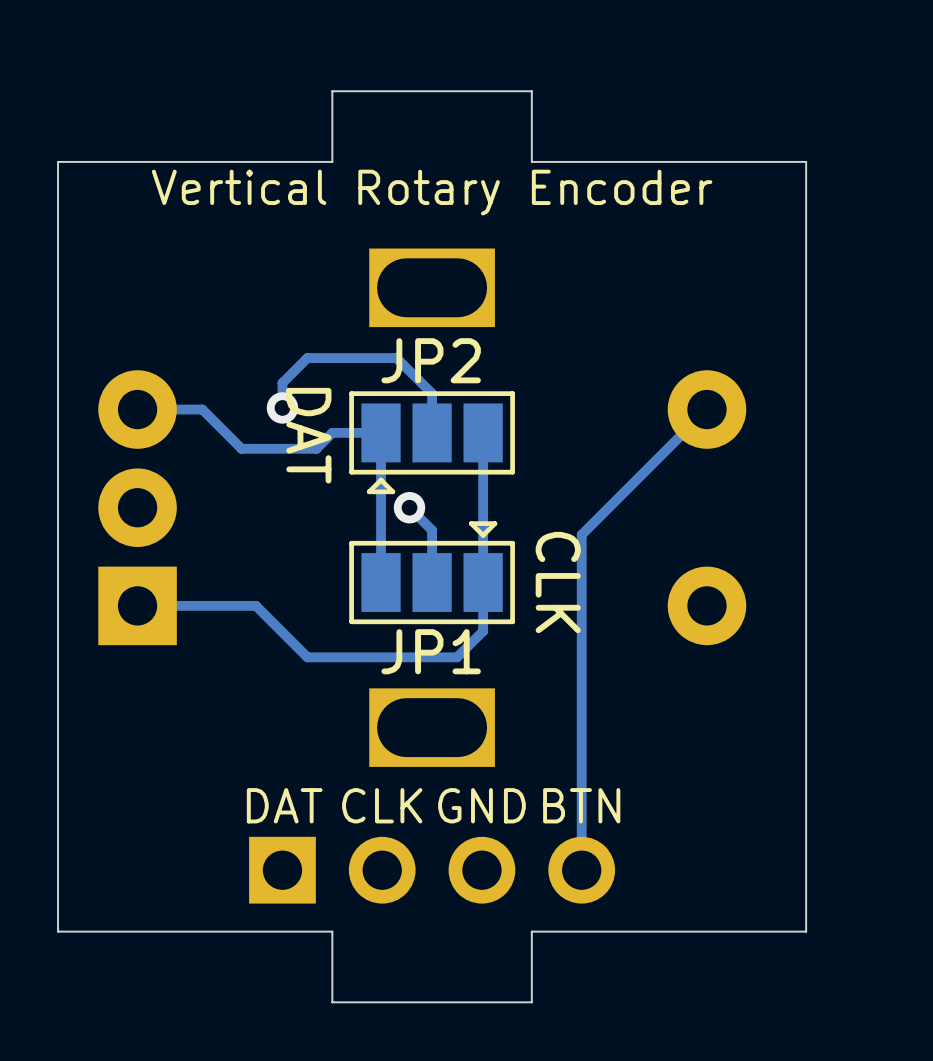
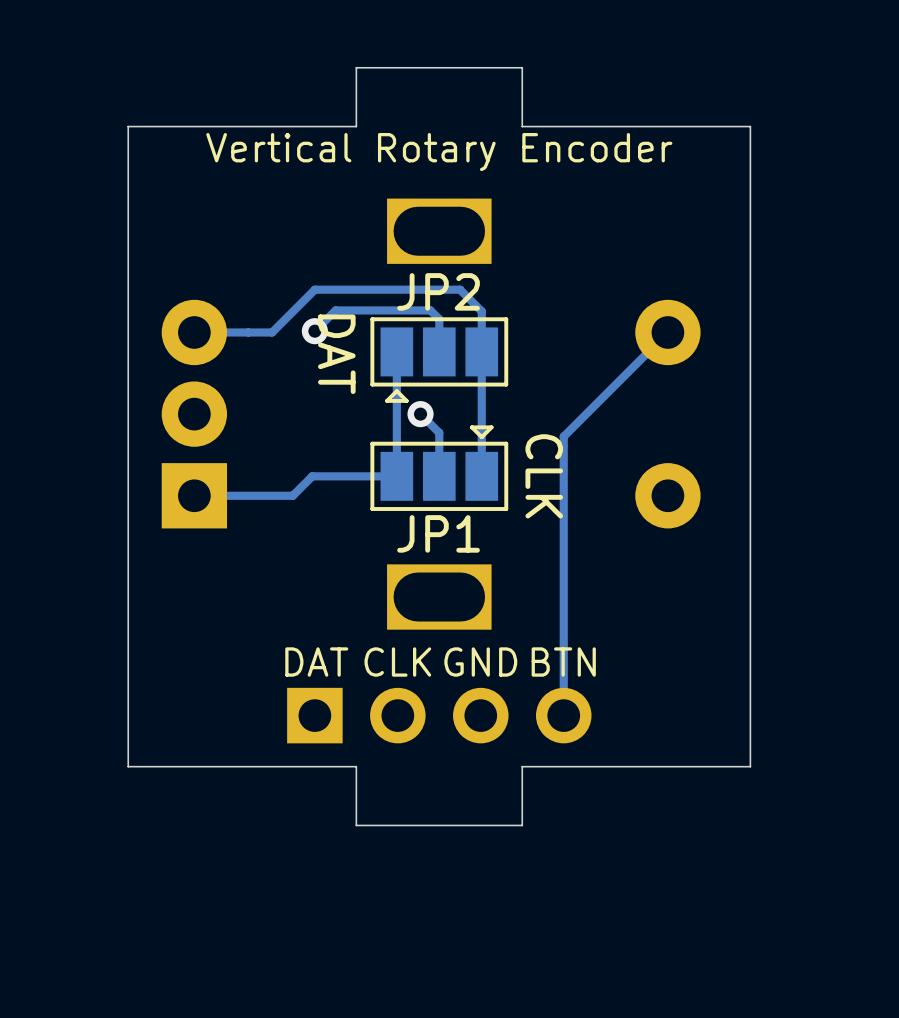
track: (307, 358) (282, 383) (282, 407) -> (335, 289) (314, 289) (272, 332) (248, 332)
track: (396, 358) (421, 383) -> (409, 289) (460, 289) (481, 311) (481, 351)
track: none -> (430, 310) (335, 310) (314, 331)
track: (202, 409) (241, 448) (316, 448) (332, 432) (381, 432) -> none
track: (483, 582) (483, 631) (457, 657) (307, 657) (255, 605) -> (396, 476) (312, 476) (292, 495)

